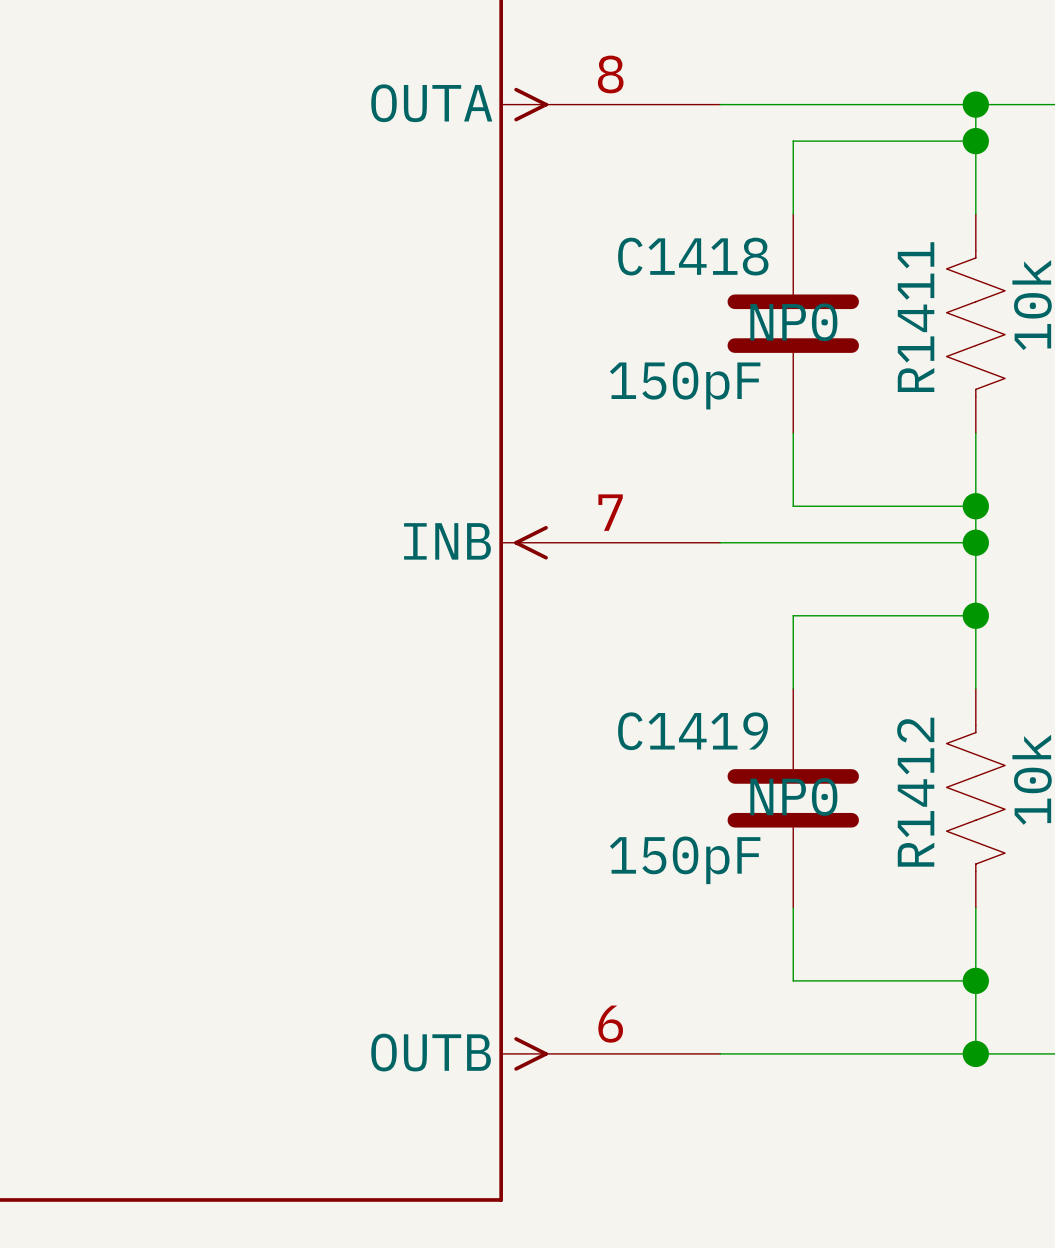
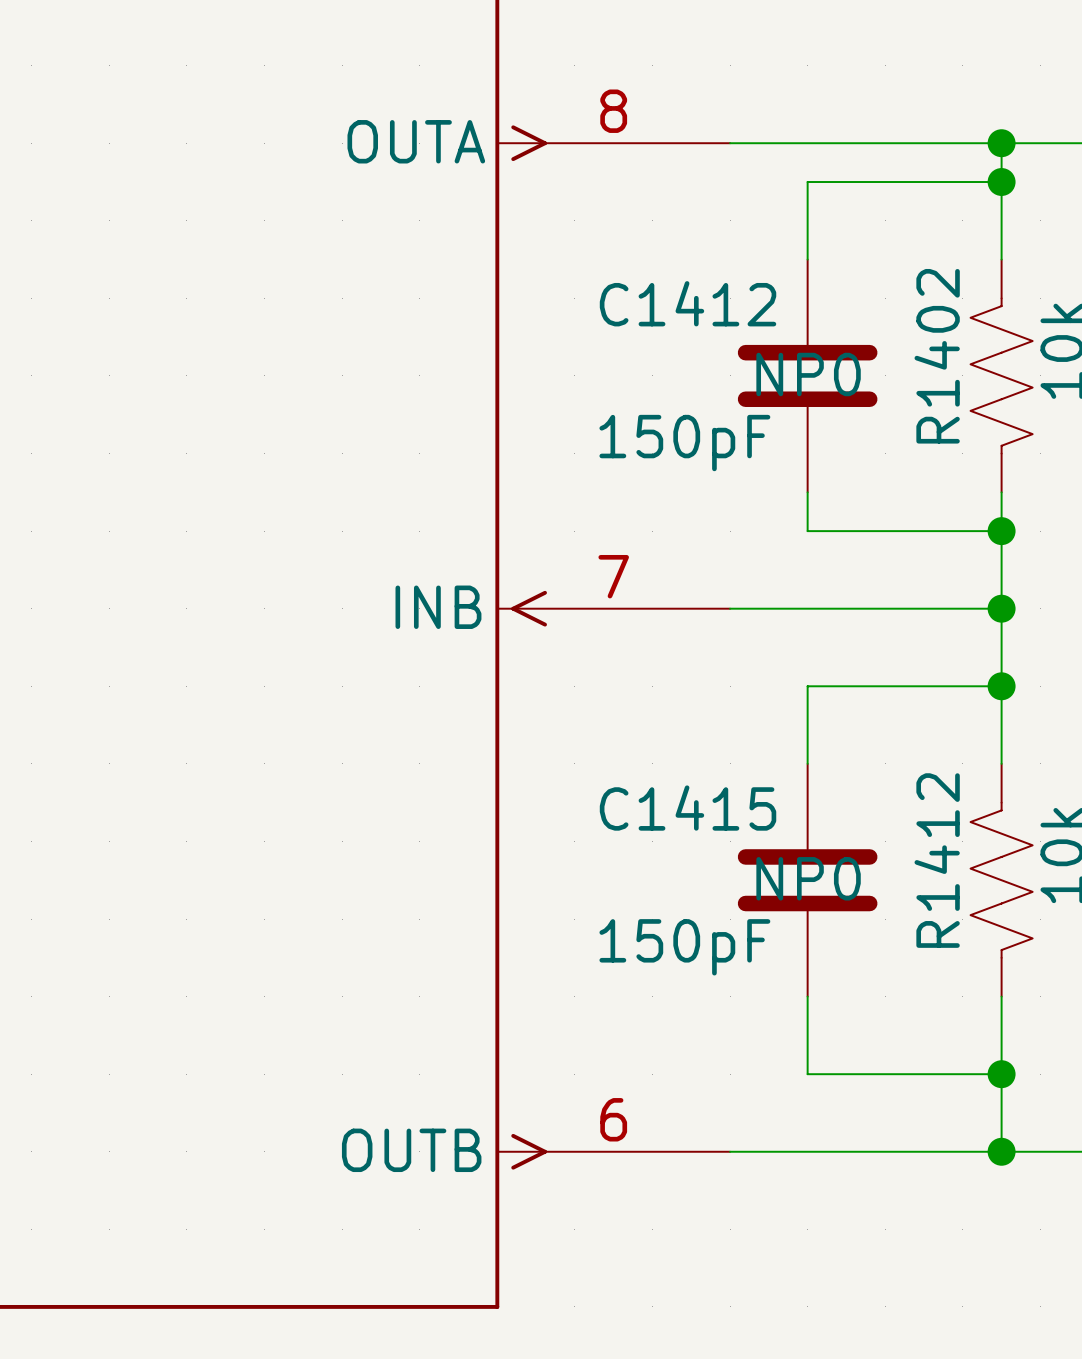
C1418 name: C1418 (693, 256) -> C1412 (688, 303)
R1411 name: R1411 (916, 317) -> R1402 (937, 356)
wire: (793, 469) (793, 506) (975, 506) -> (807, 531) (1001, 531)
junction position: (975, 506) -> (1001, 531)
C1419 name: C1419 (693, 731) -> C1415 (688, 808)

